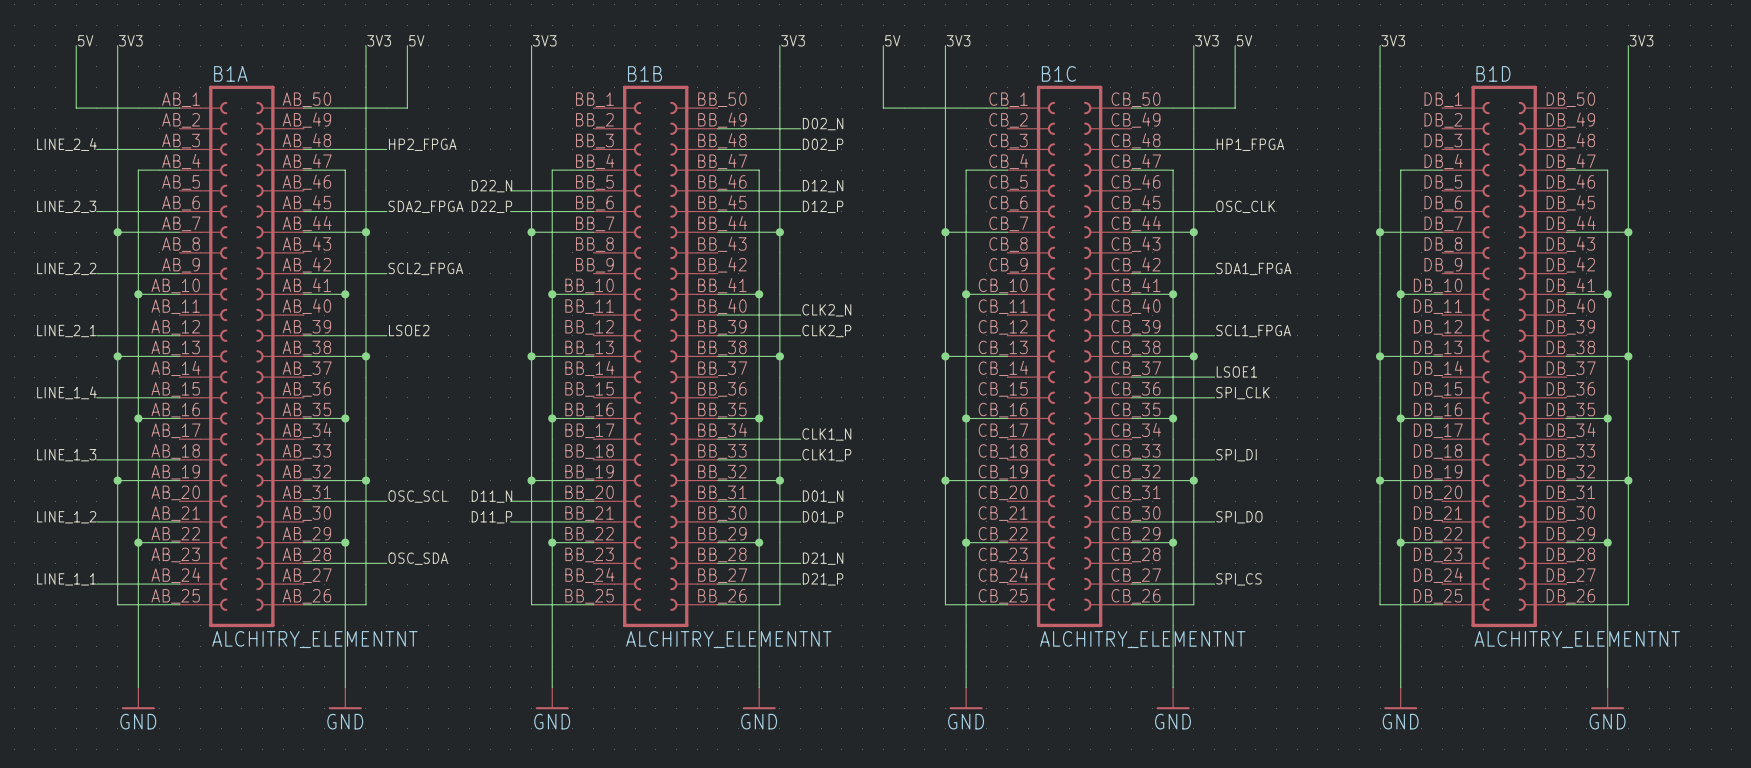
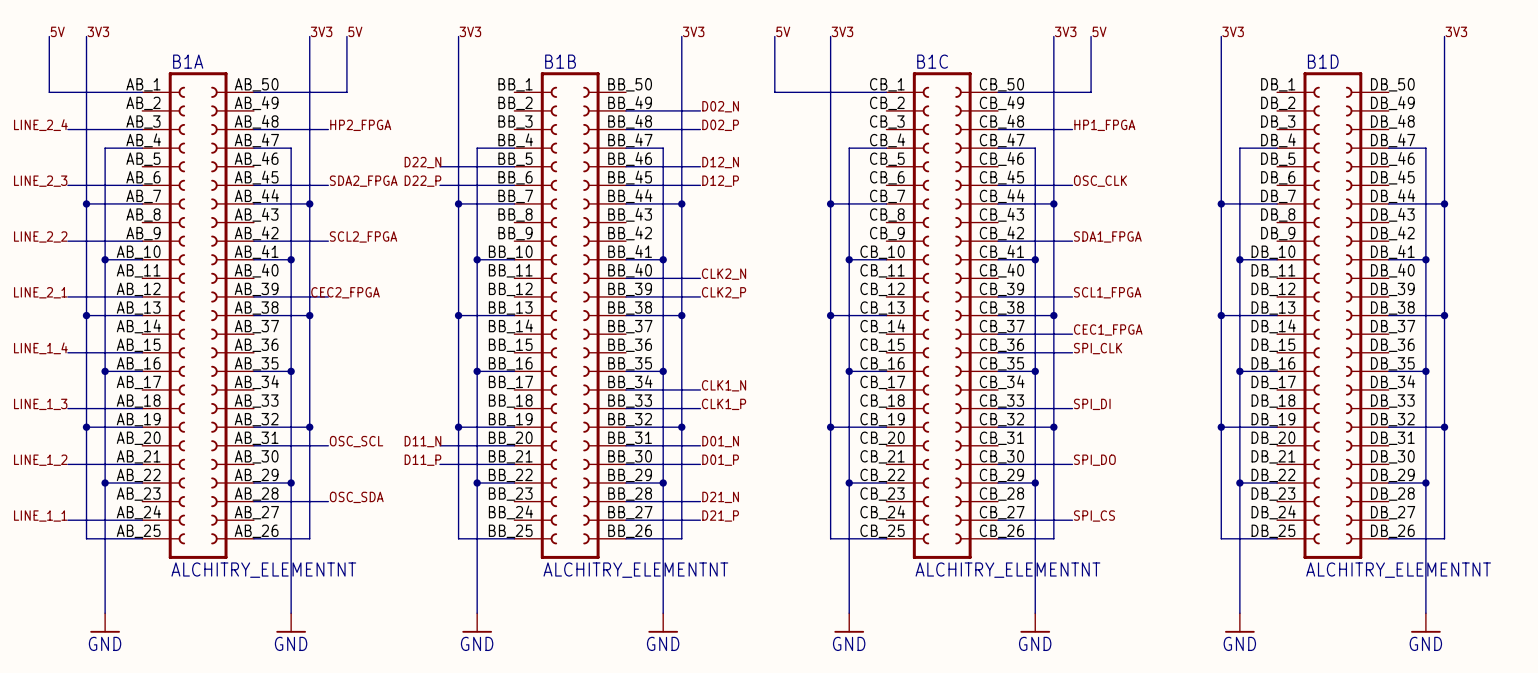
label: LSOE2 (409, 330) -> none
label: none -> CEC2_FPGA (345, 292)
label: LSOE1 (1236, 371) -> CEC1_FPGA (1108, 329)

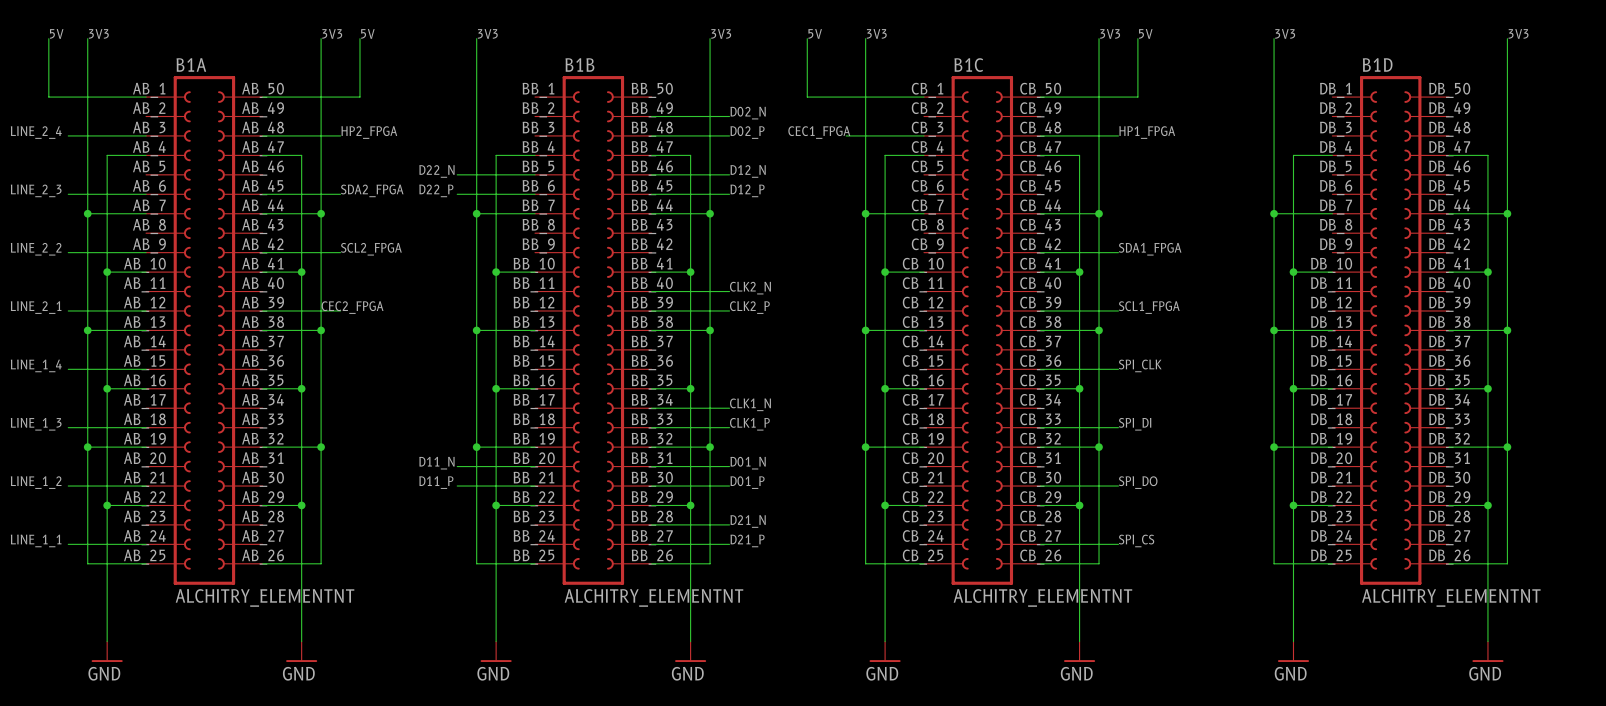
label: none -> CEC1_FPGA (819, 132)
wire: none -> (846, 135) (923, 135)
label: OSC_CLK (1100, 181) -> none
wire: (998, 185) (1072, 185) -> none
label: CEC1_FPGA (1108, 329) -> none
wire: (998, 334) (1072, 334) -> none
label: OSC_SCL (356, 441) -> none
wire: (253, 445) (328, 445) -> none
label: OSC_SDA (356, 497) -> none
wire: (253, 501) (328, 501) -> none

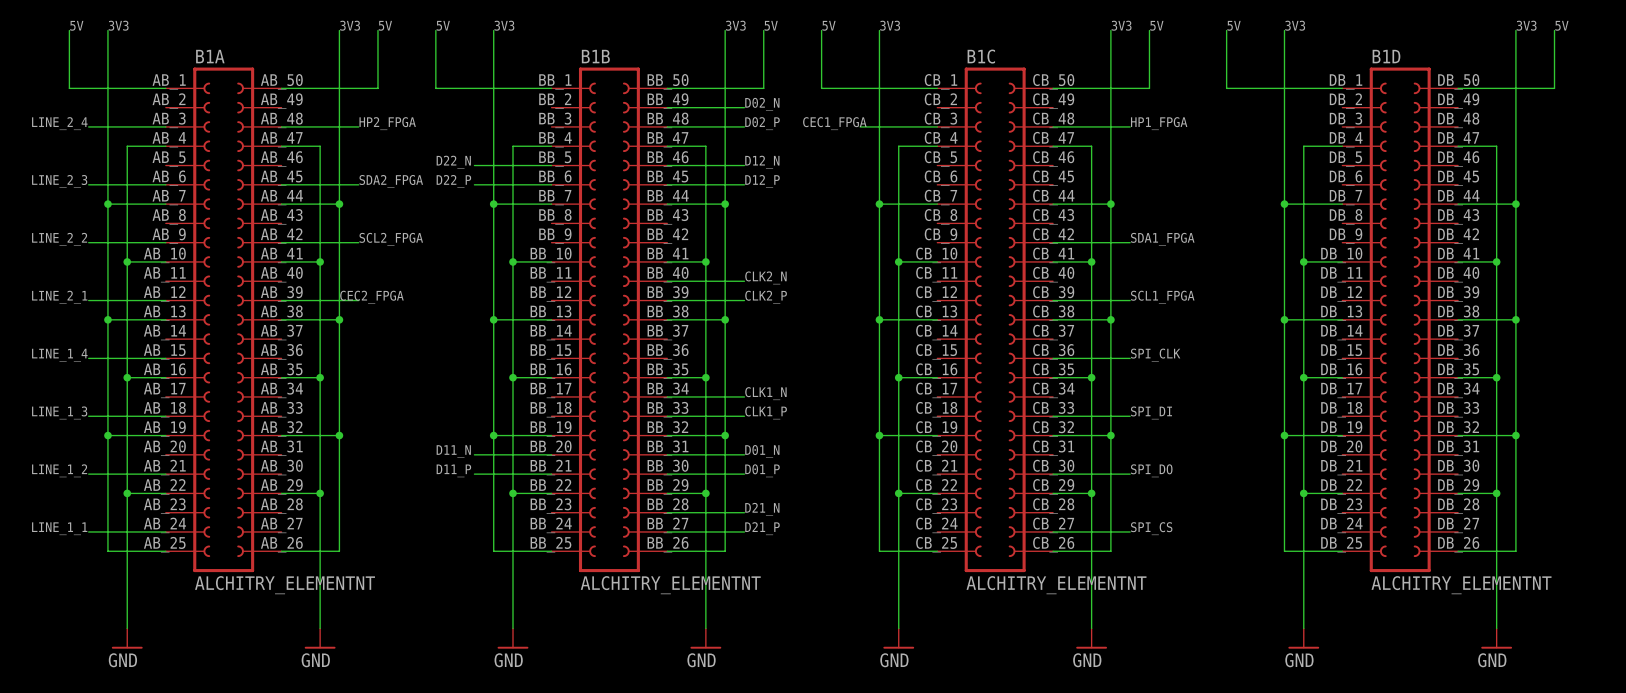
label: none -> 5V (443, 25)
label: none -> 5V (771, 25)
label: none -> 5V (1234, 25)
label: none -> 5V (1561, 25)
wire: none -> (435, 30) (435, 88) (551, 88)
wire: none -> (763, 30) (763, 88) (667, 88)
wire: none -> (1226, 30) (1226, 88) (1342, 88)
wire: none -> (1554, 30) (1554, 88) (1458, 88)

